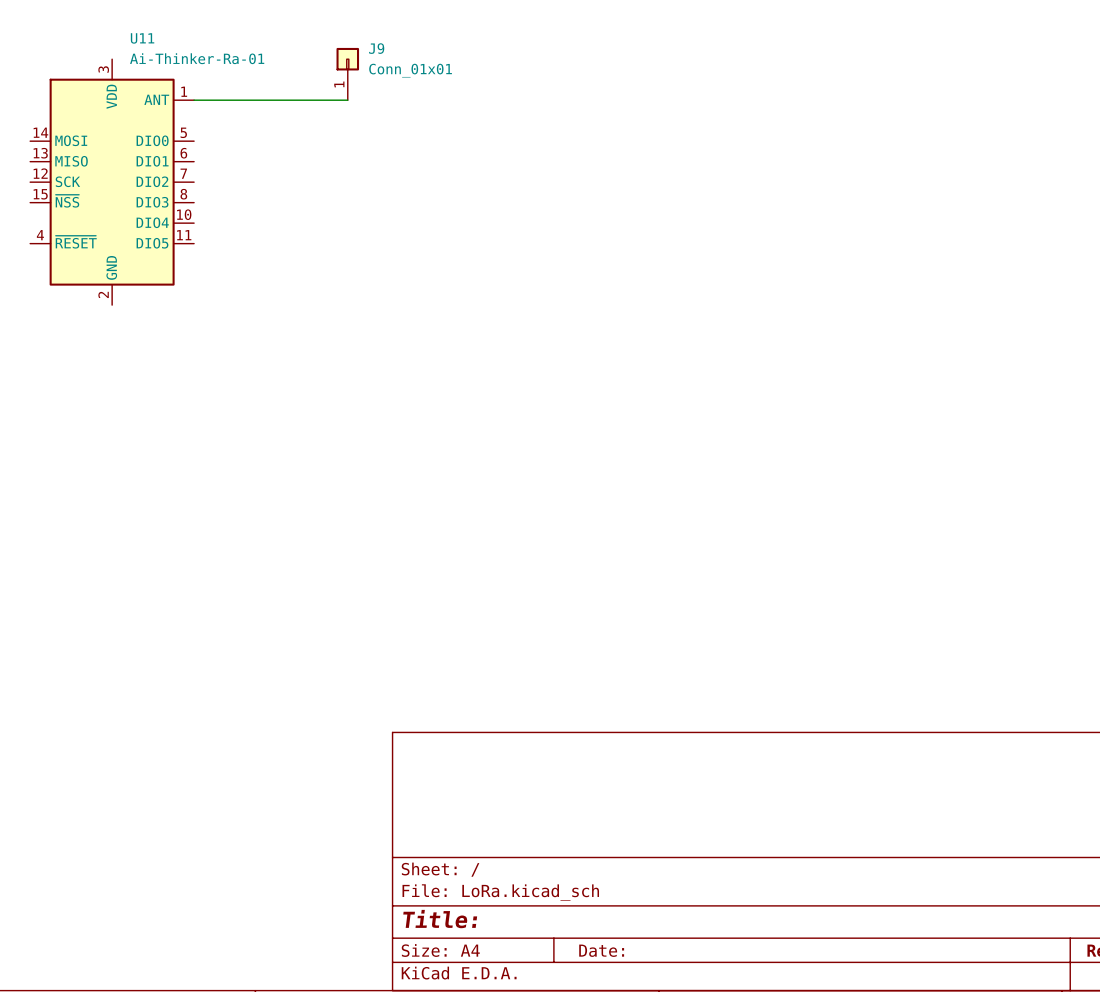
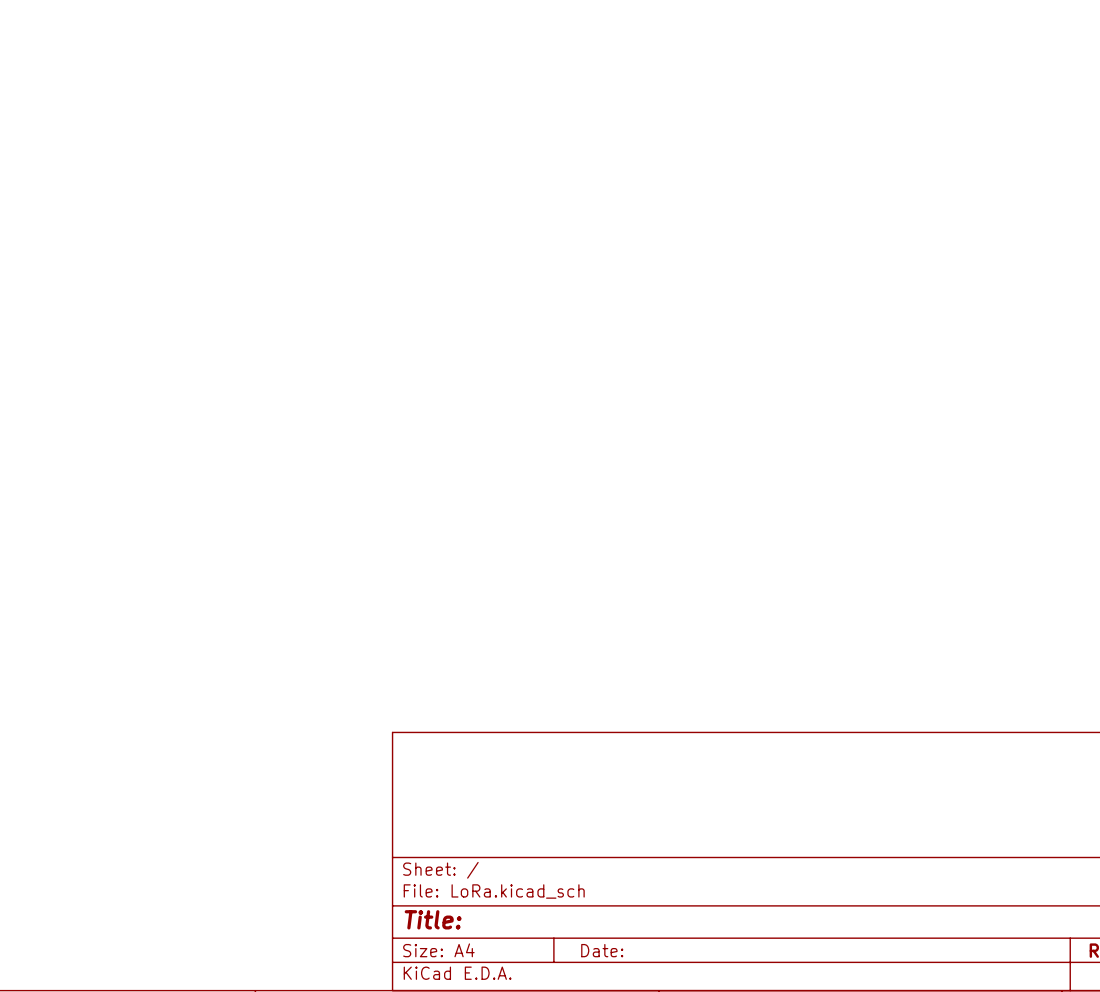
J9: Conn_01x01 (347, 74) -> none
wire: (194, 100) (347, 100) -> none
U11: Ai-Thinker-Ra-01 (112, 182) -> none

